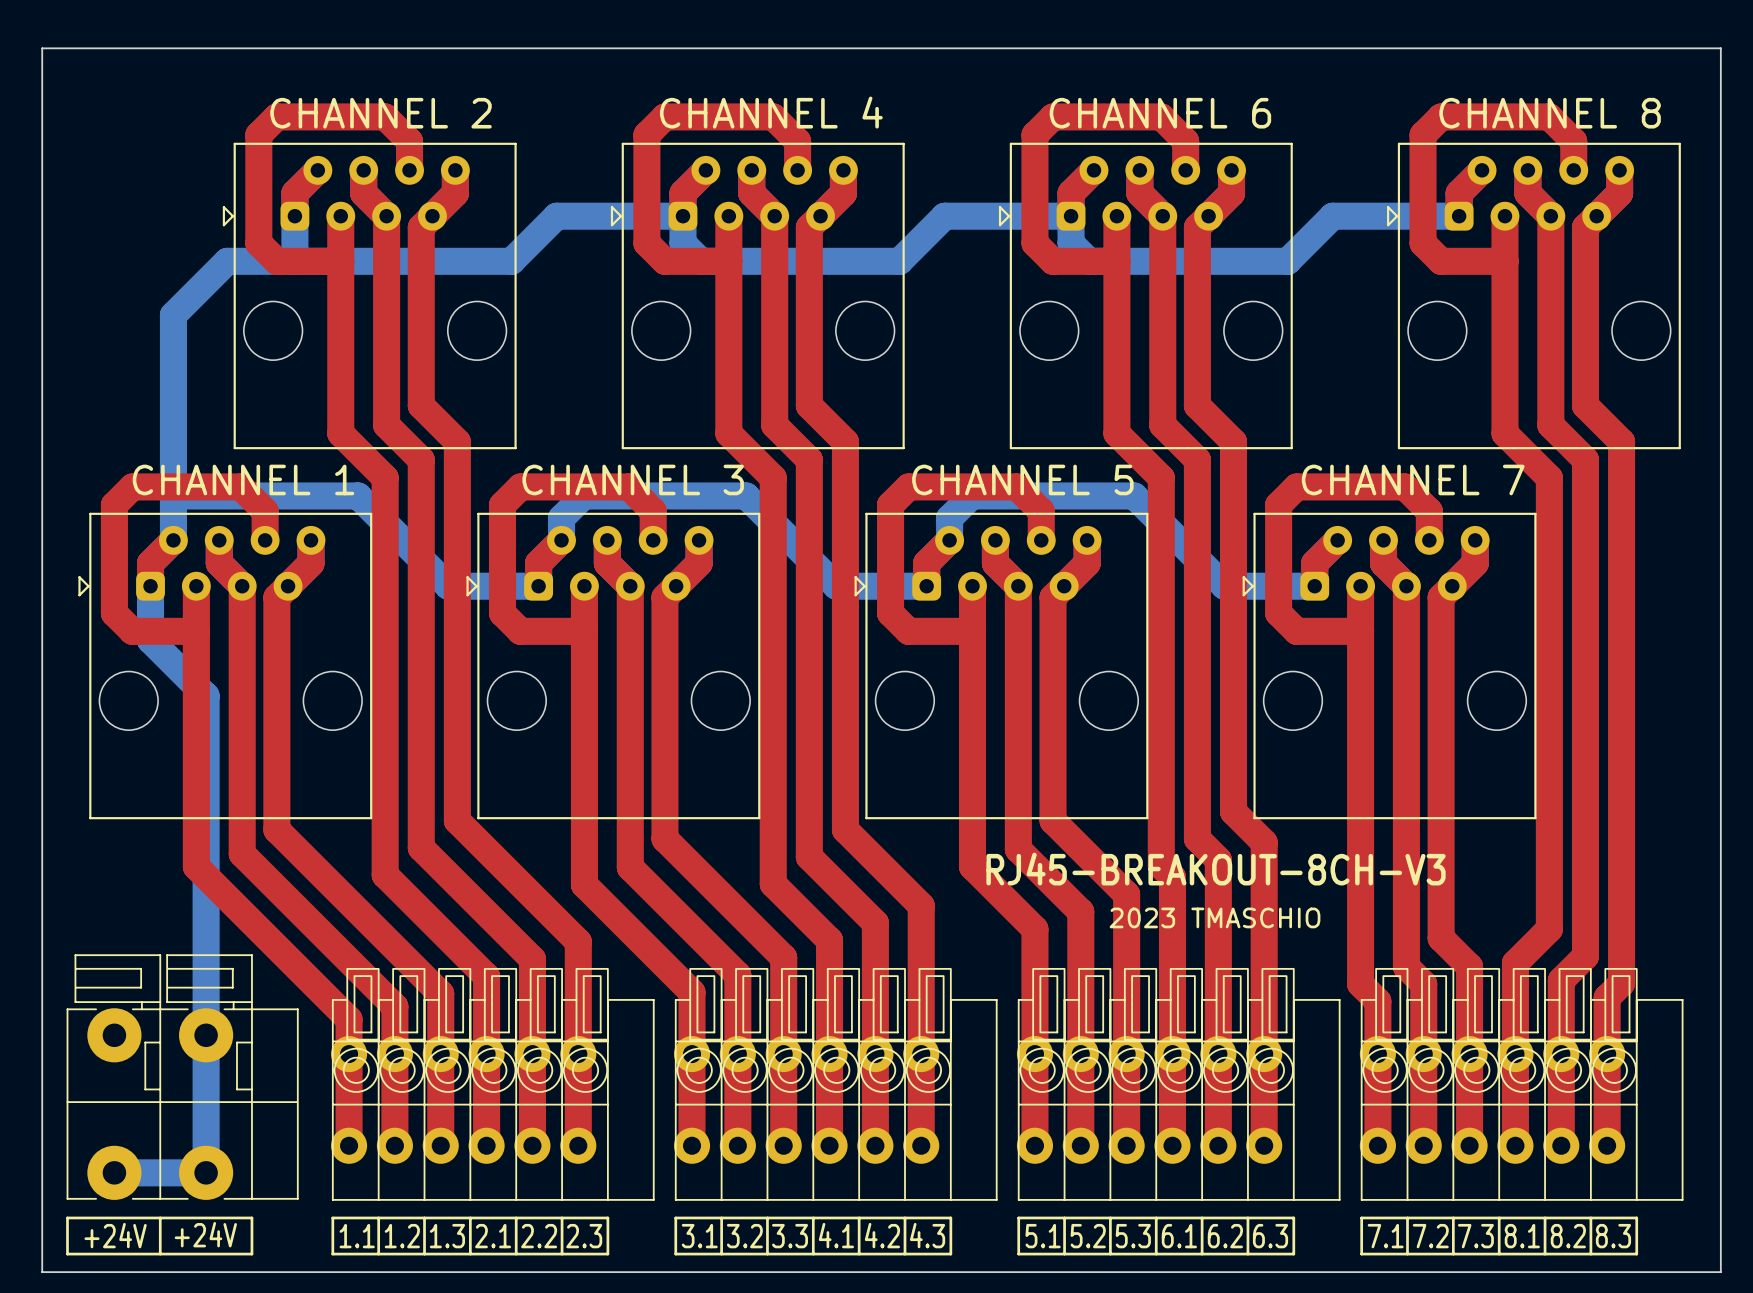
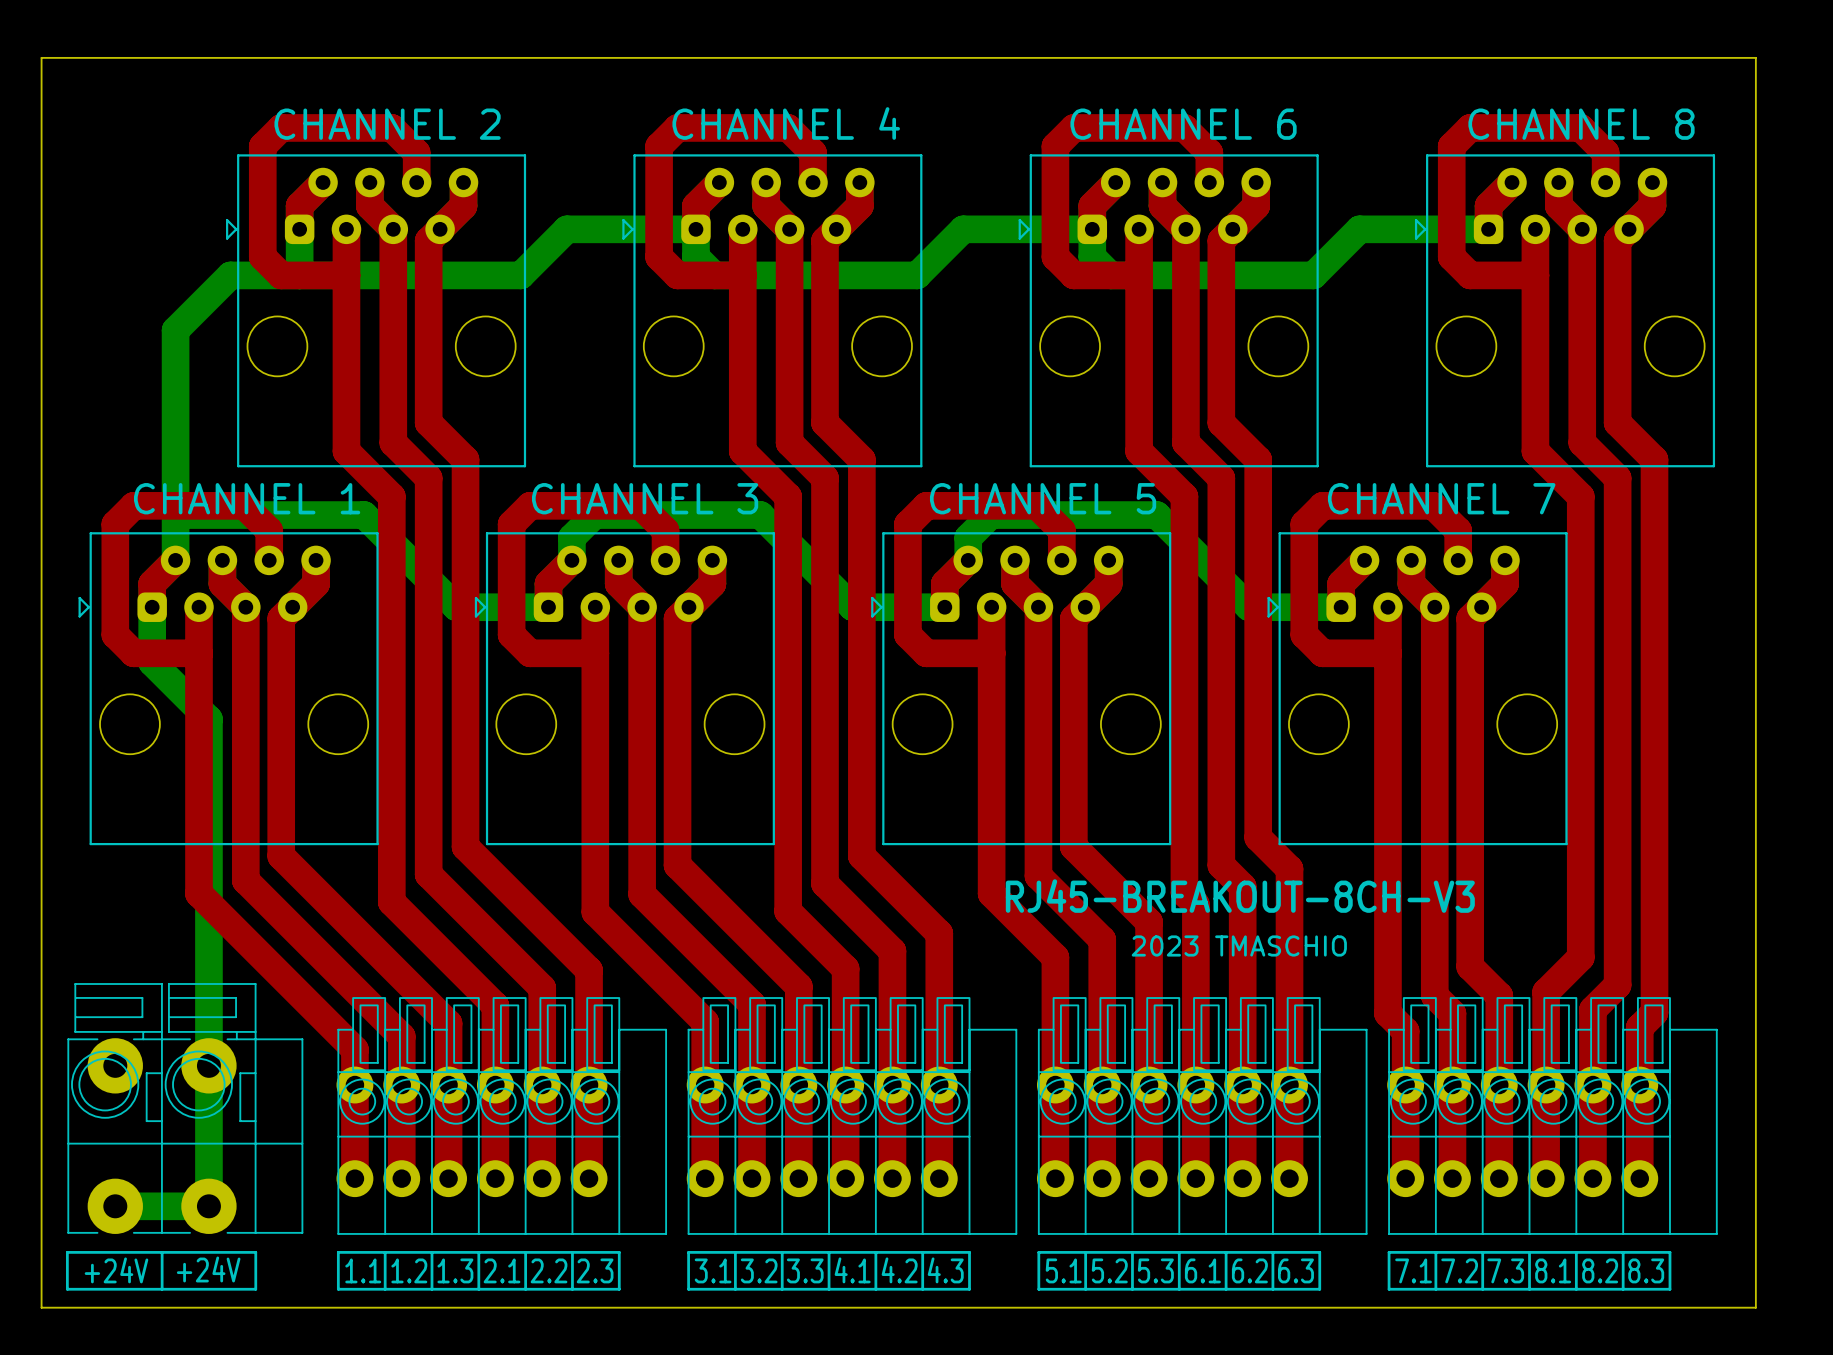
part footprint: [66, 954, 299, 1200] -> [67, 983, 304, 1234]

